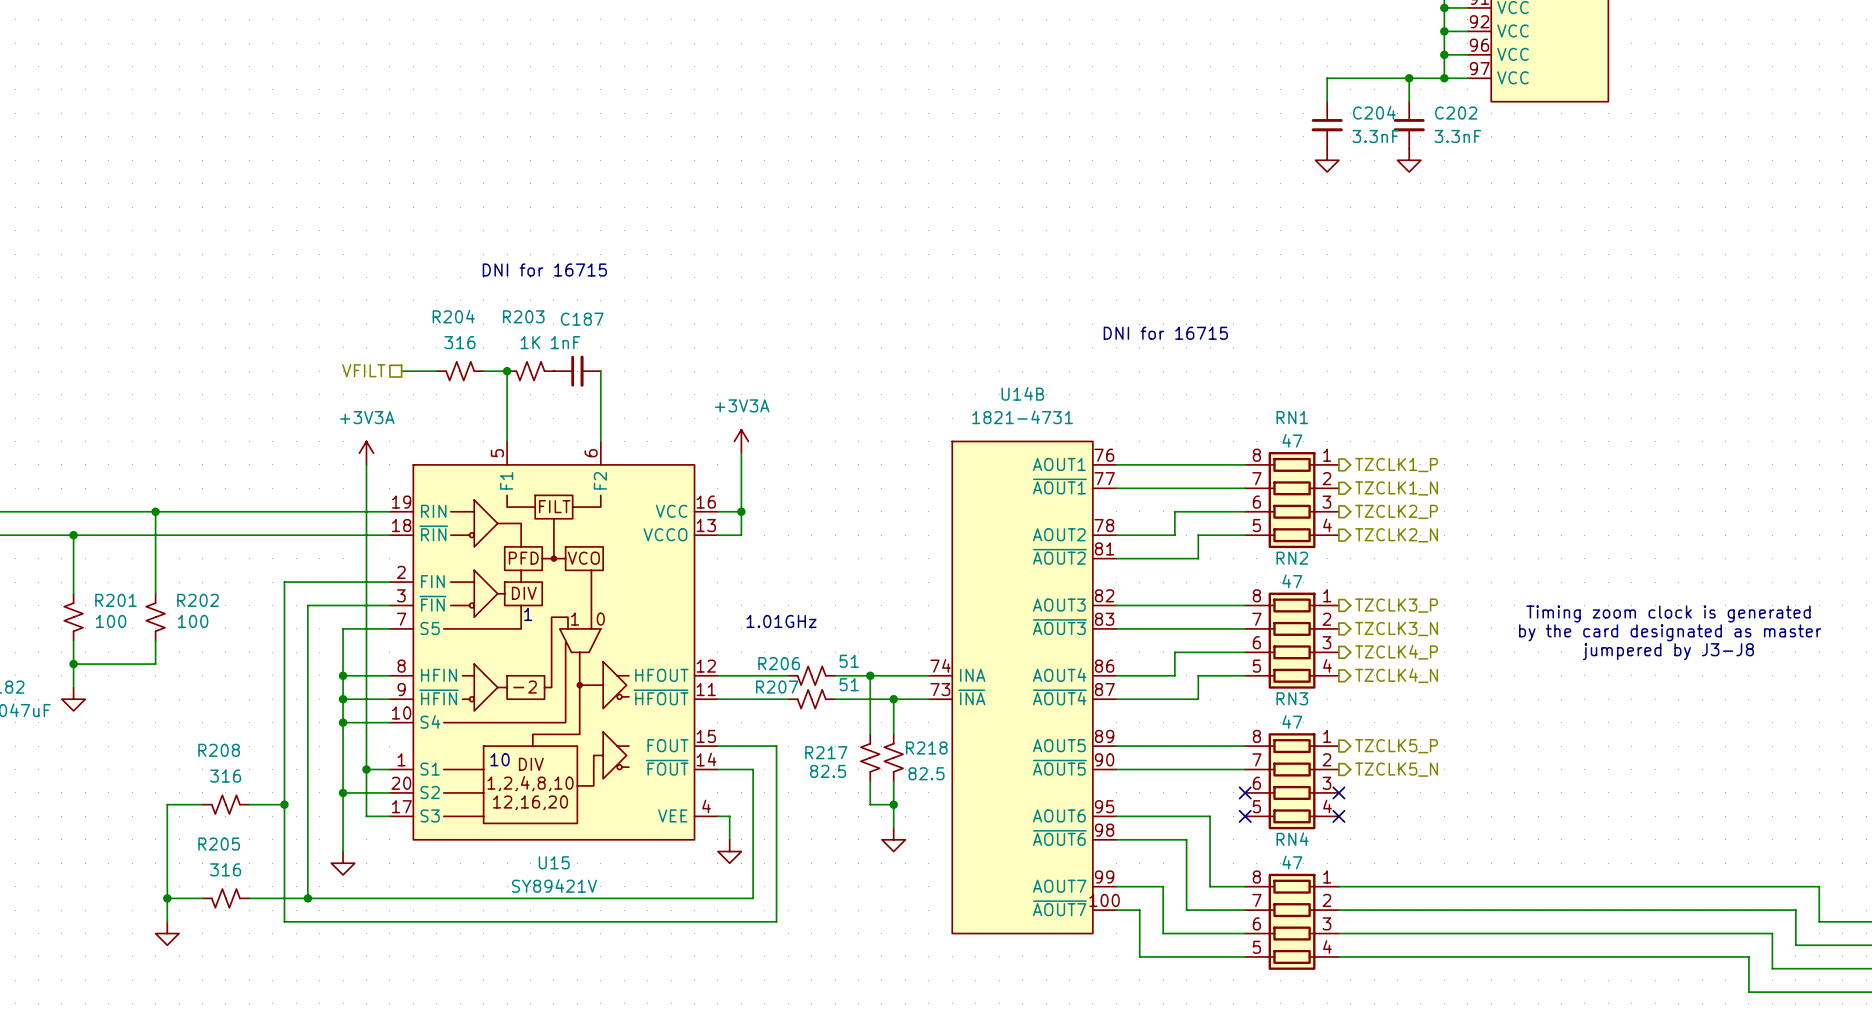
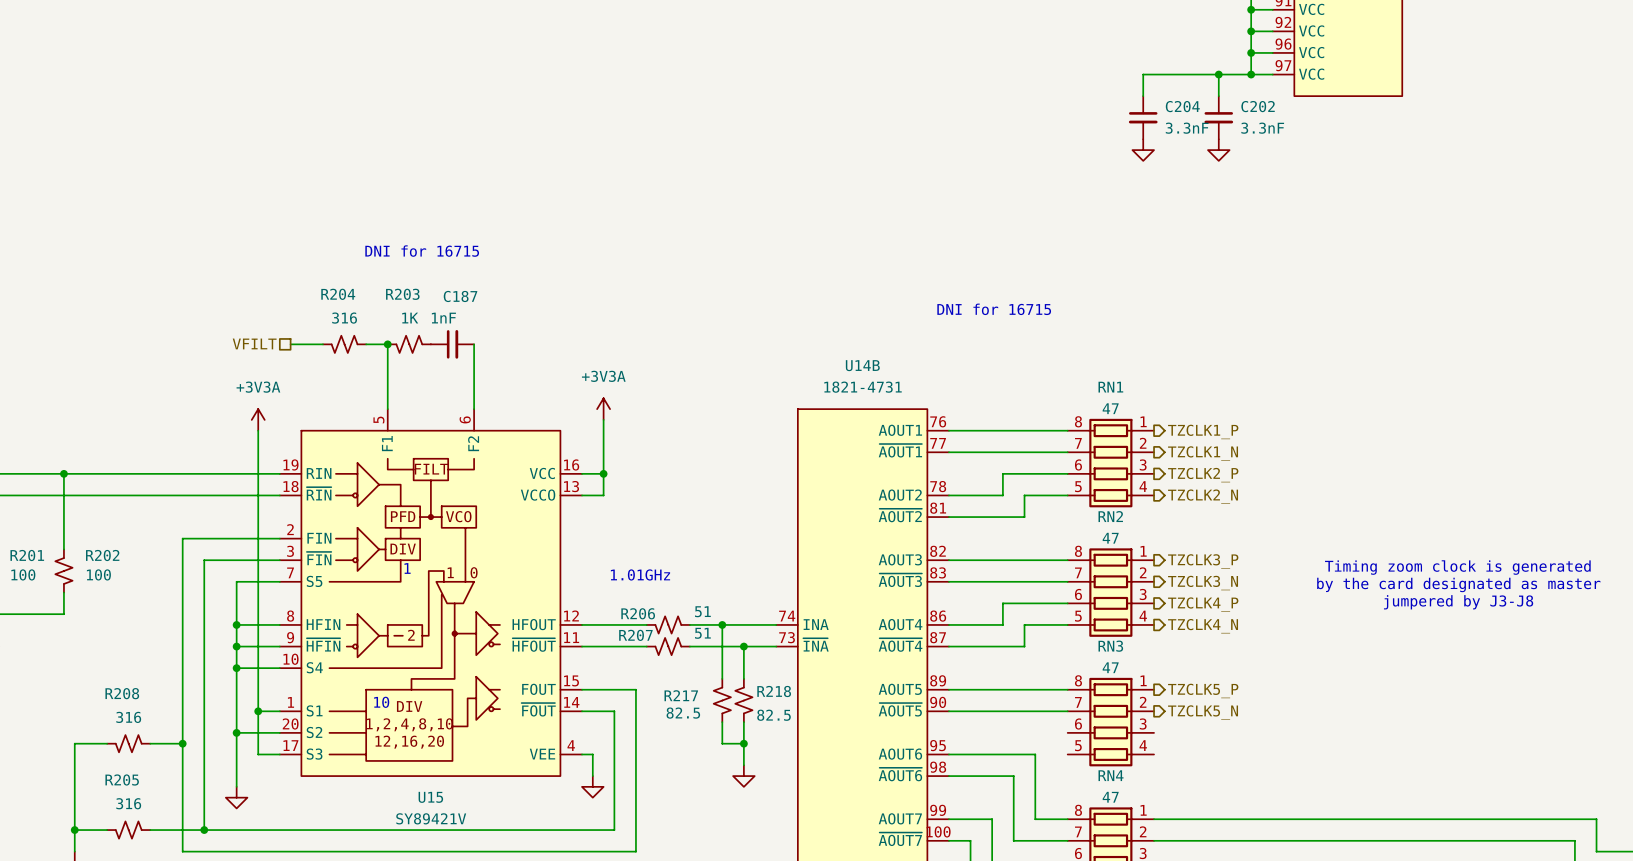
no-connect mark: (1245, 792) -> none
no-connect mark: (1338, 792) -> none
no-connect mark: (1245, 816) -> none
no-connect mark: (1338, 816) -> none

